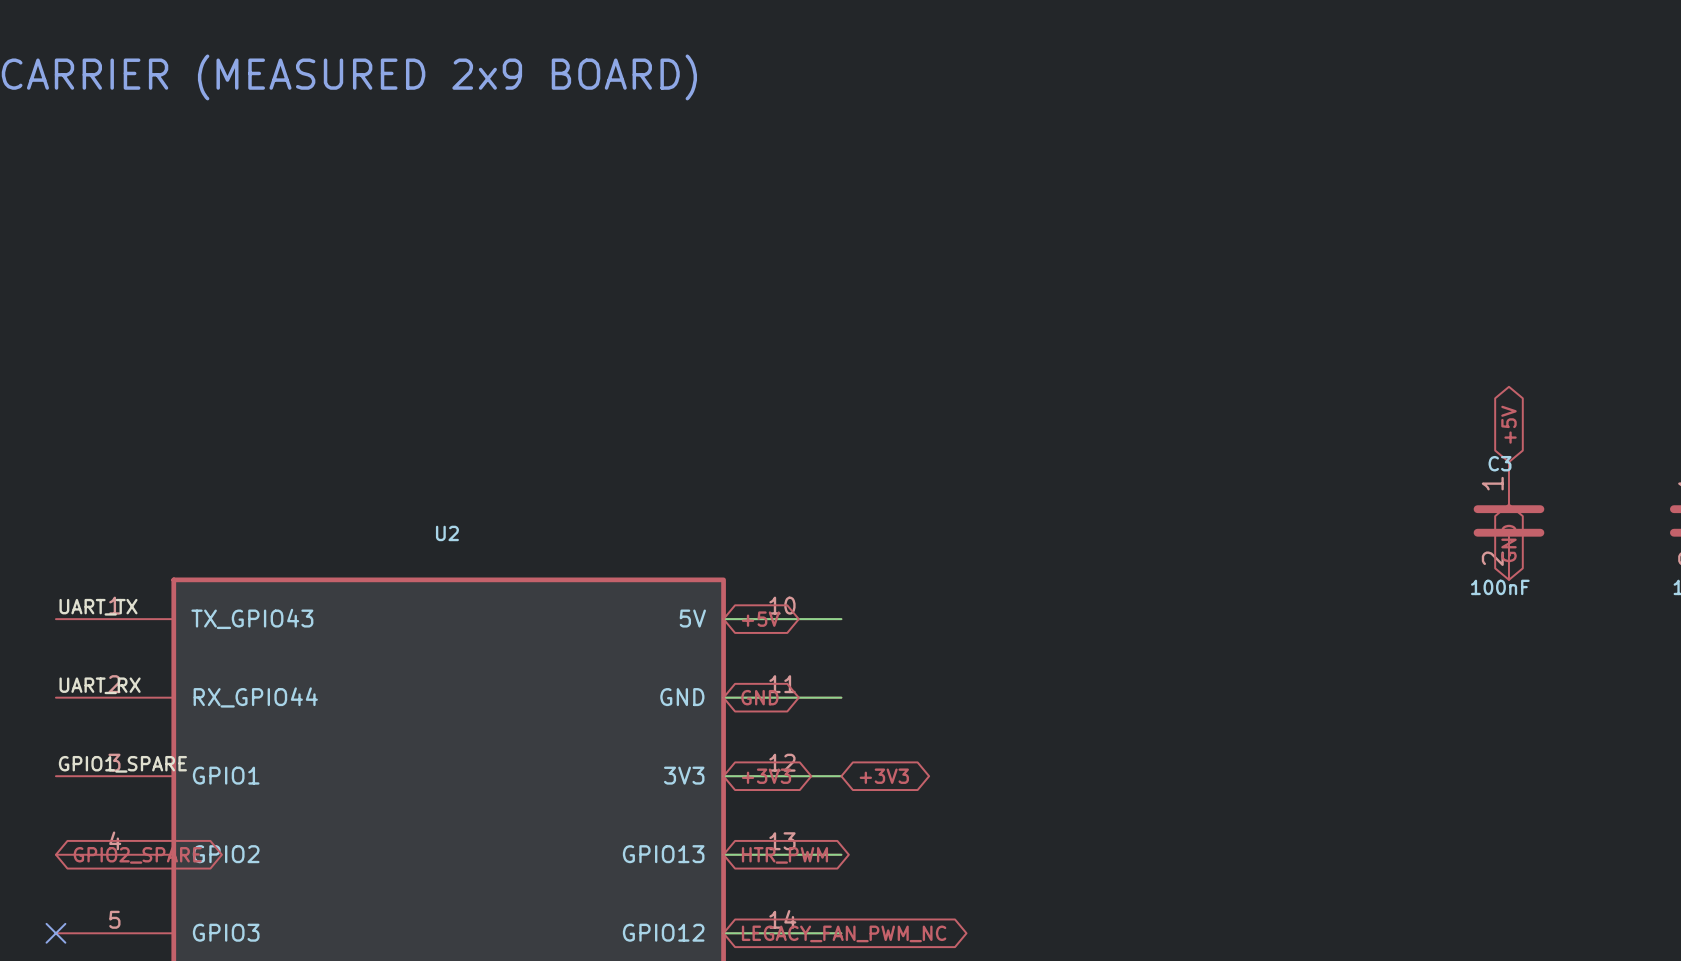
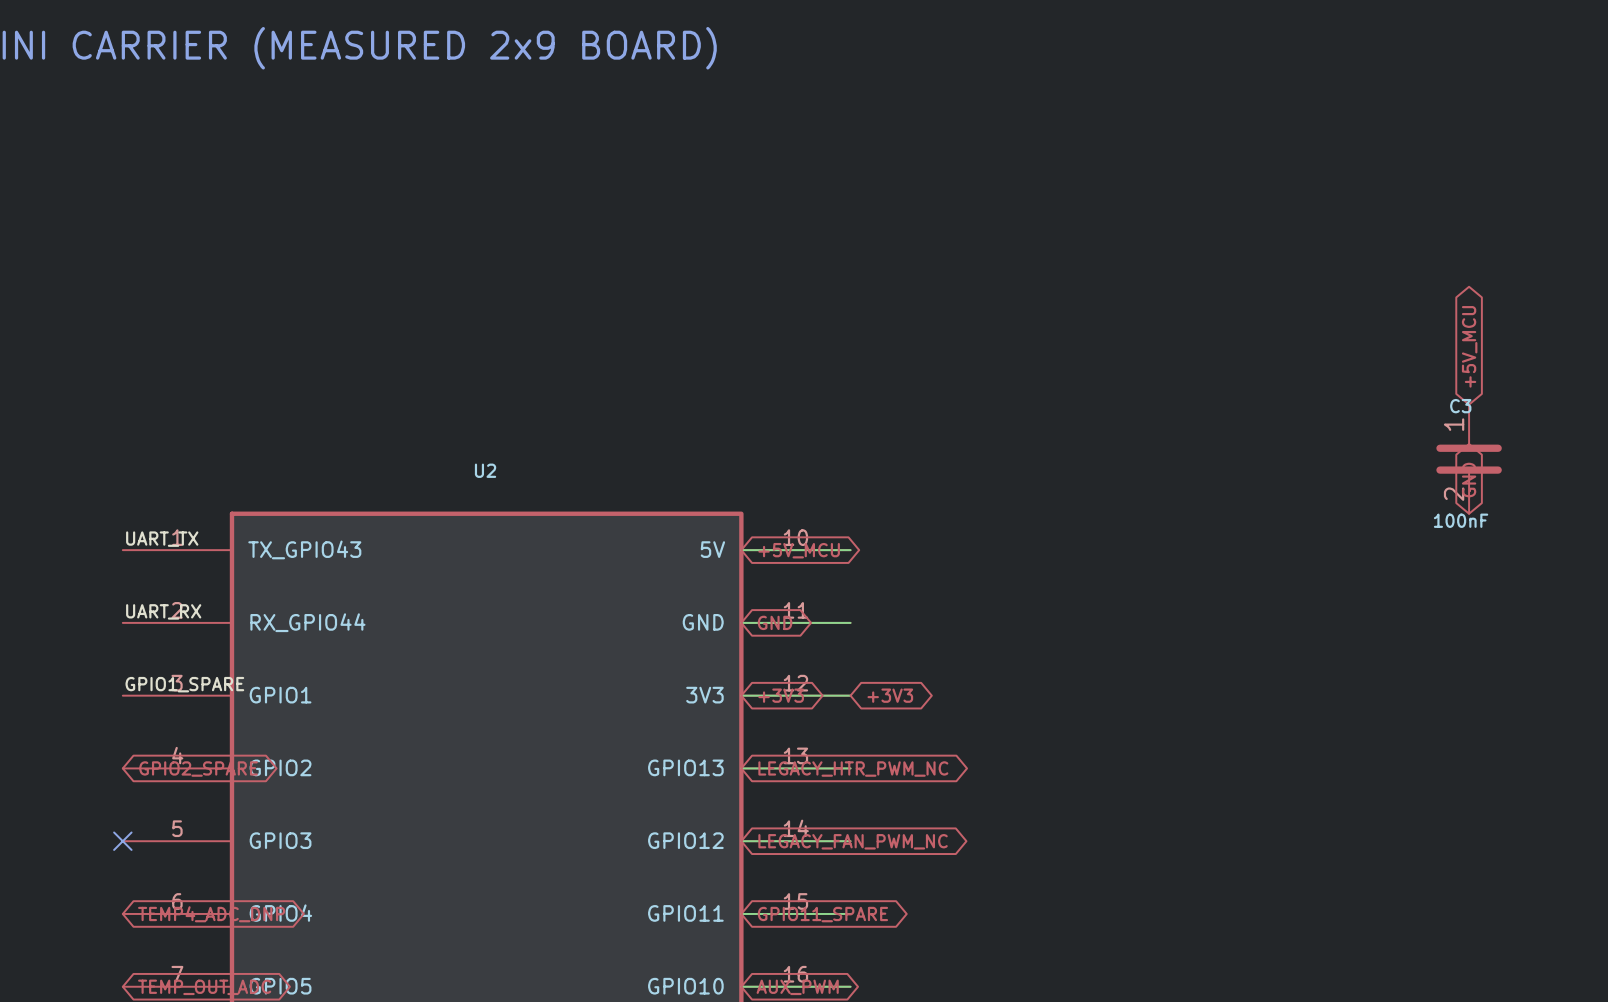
global label: +5V (1508, 424) -> +5V_MCU (1469, 346)
global label: +5V (760, 619) -> +5V_MCU (799, 550)
global label: HTR_PWM (784, 855) -> LEGACY_HTR_PWM_NC (853, 769)

